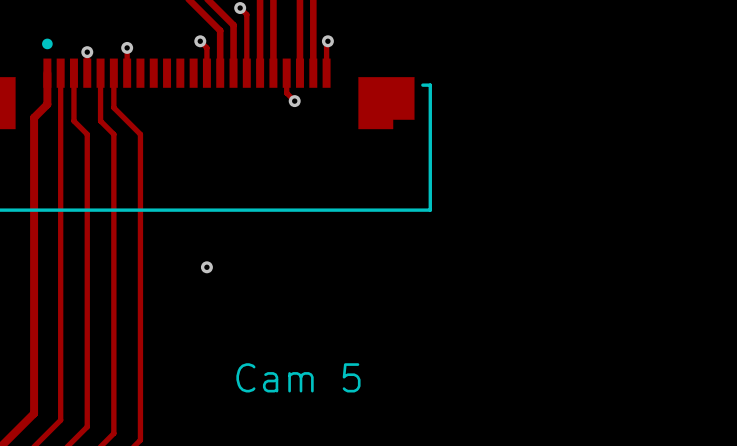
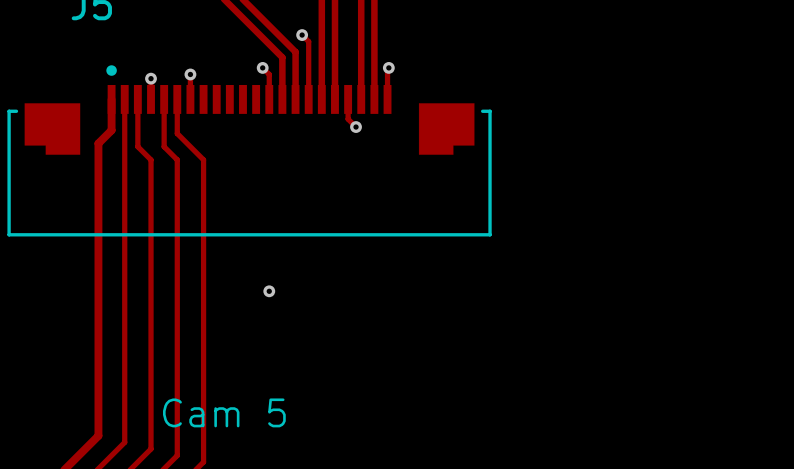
text position: Cam 5 (298, 377) -> Cam 5 (224, 412)

